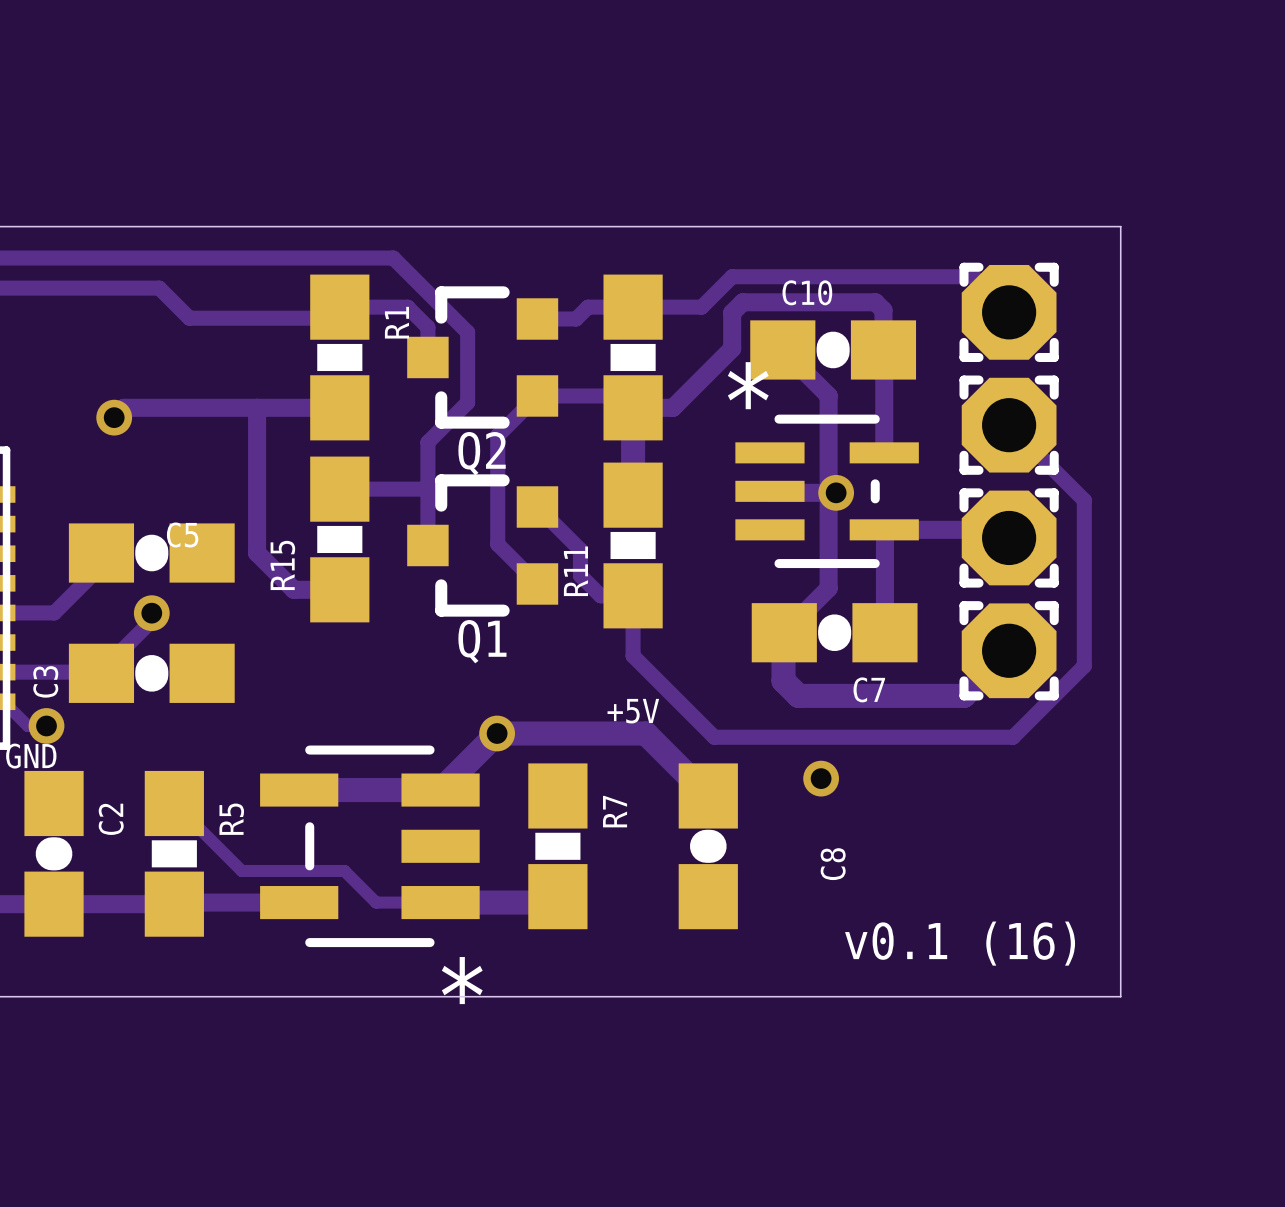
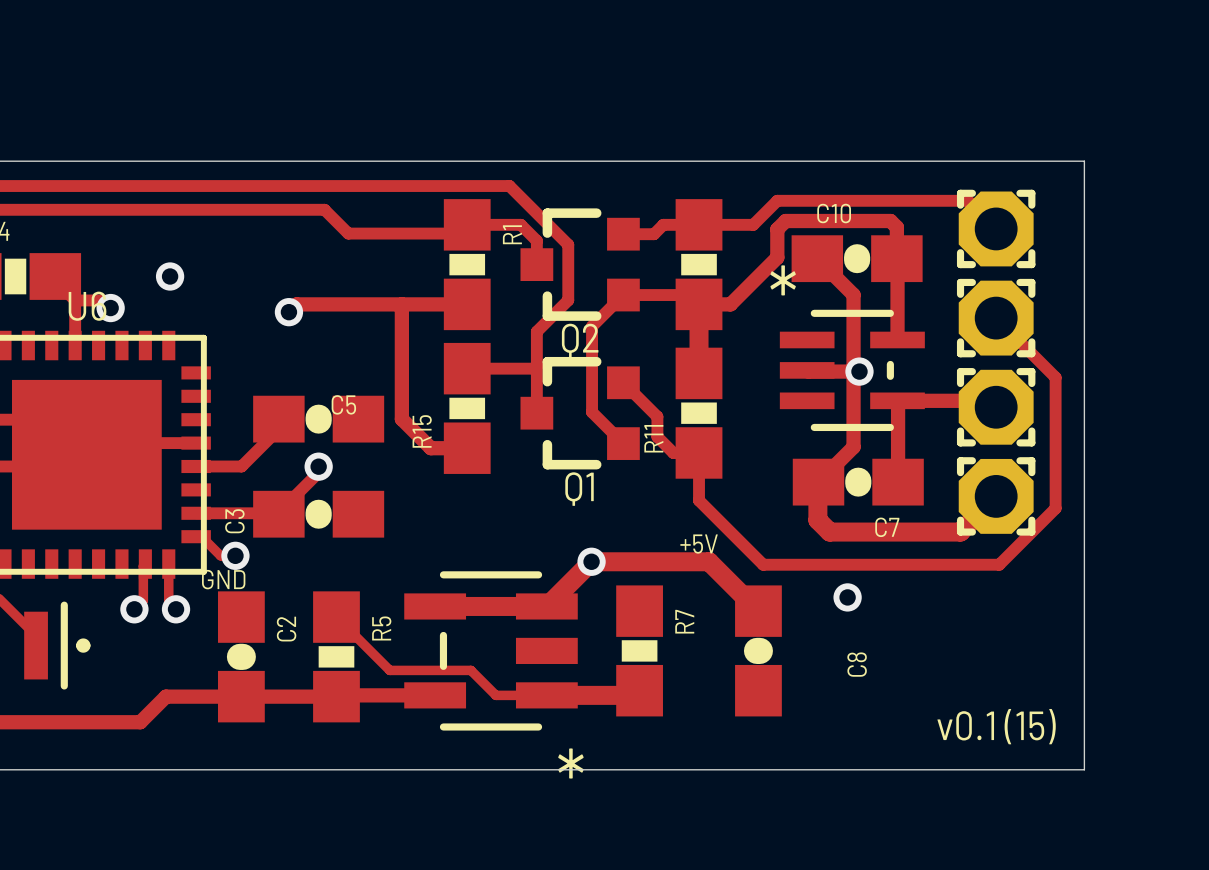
text: v0.1 (16) (960, 943) -> v0.1 (15) (996, 726)

